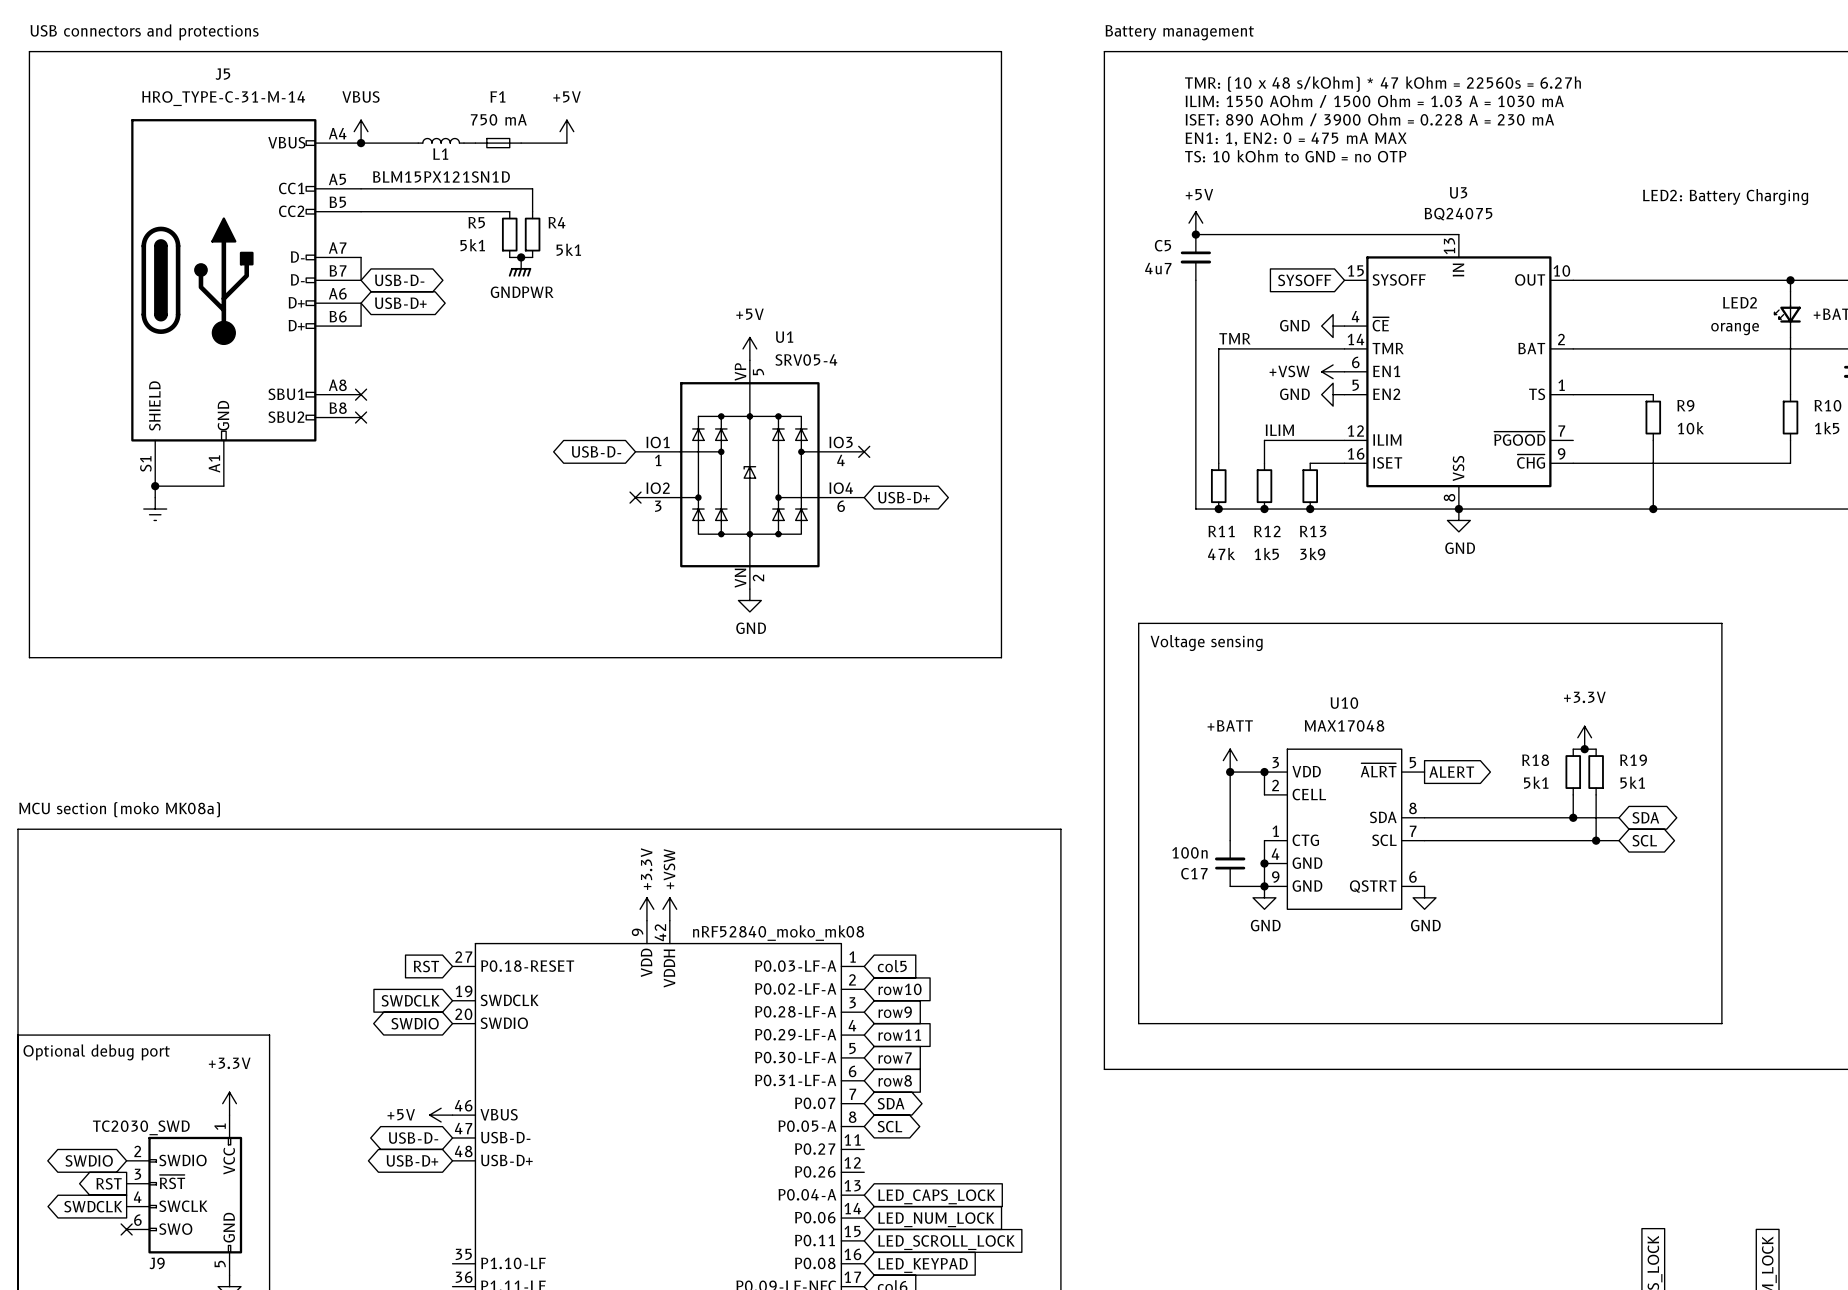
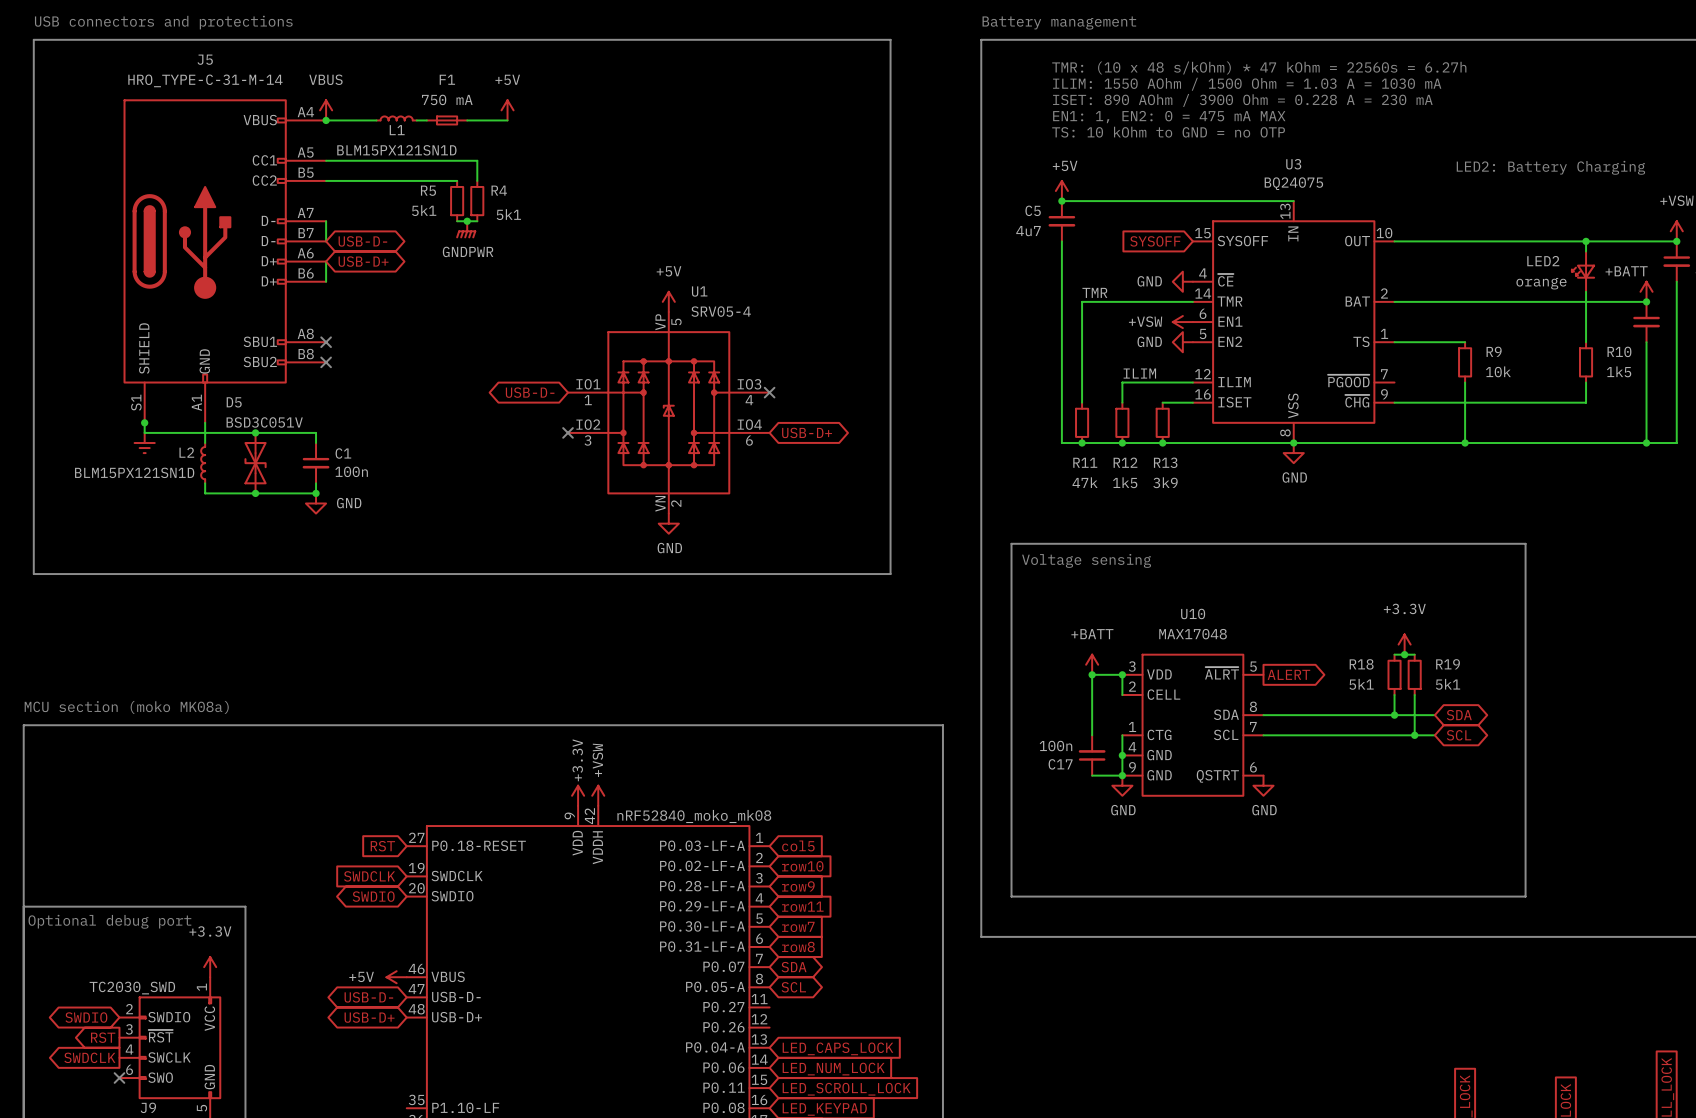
wire: (155, 486) (223, 486) -> (205, 443) (205, 422)
wire: none -> (144, 432) (316, 432) (316, 443)
junction: none -> (255, 432)
L2: none -> BLM15PX121SN1D (203, 463)
D5: none -> BSD3C051V (255, 463)
C1: none -> 100n (316, 463)
wire: none -> (205, 483) (205, 493) (316, 493) (316, 483)
junction: none -> (255, 493)
junction: none -> (316, 493)
power symbol: none -> GND (316, 503)

